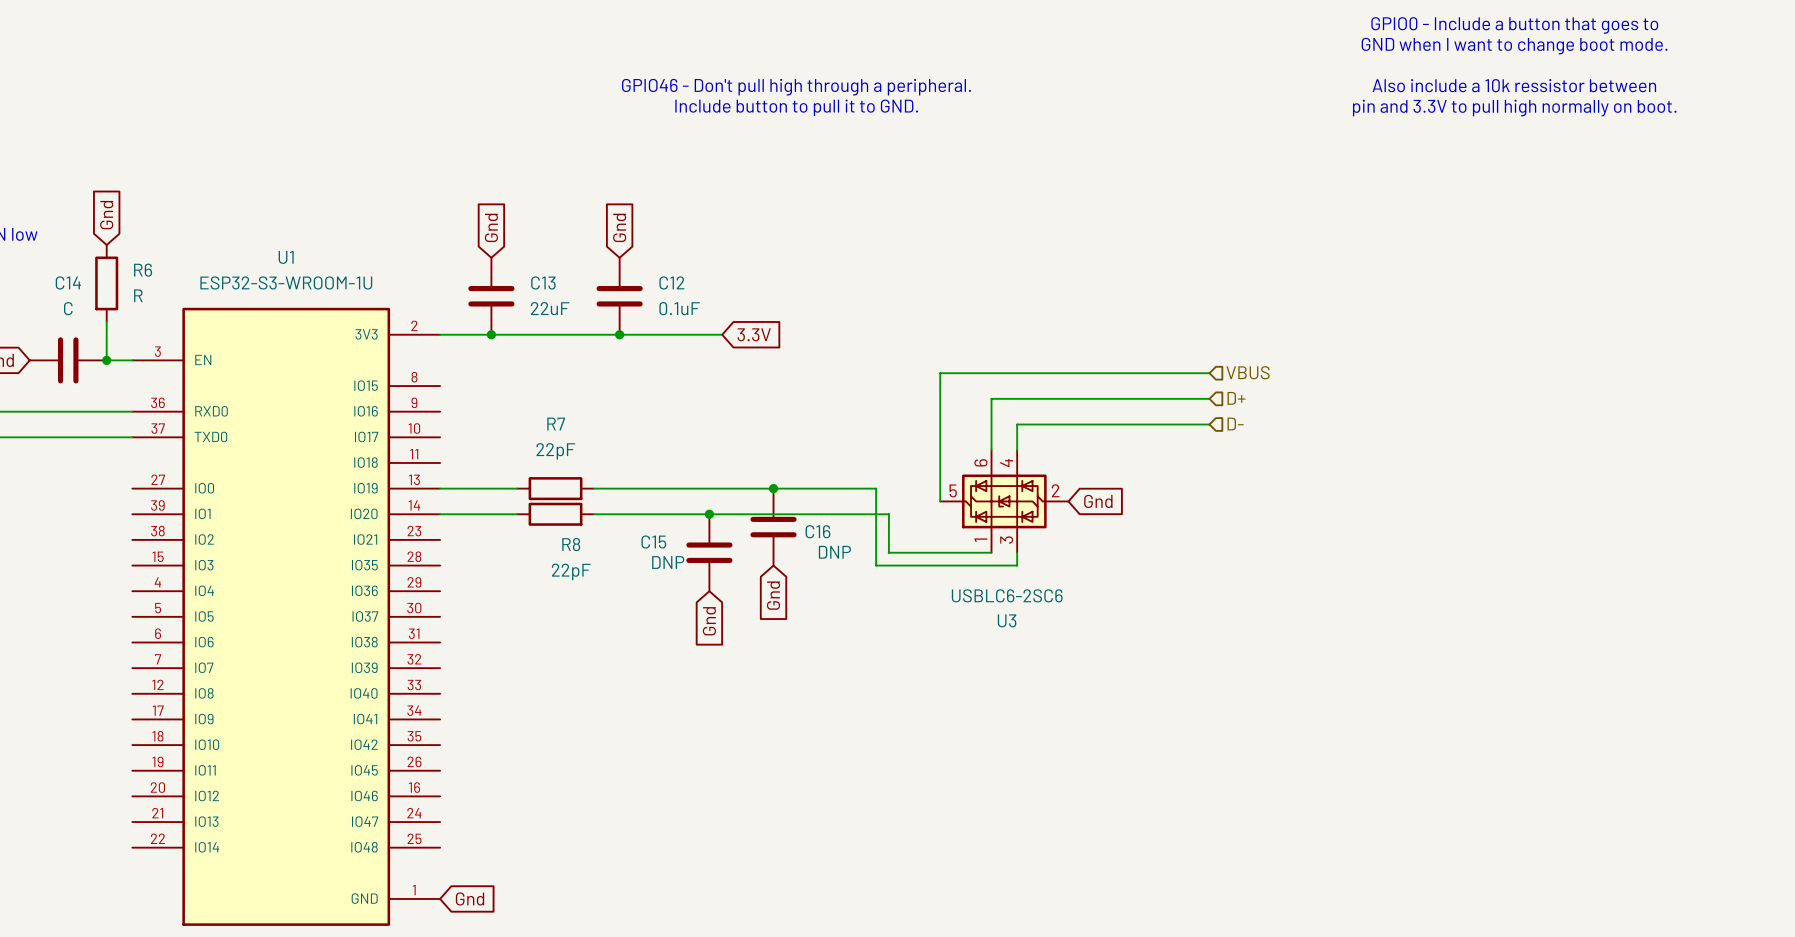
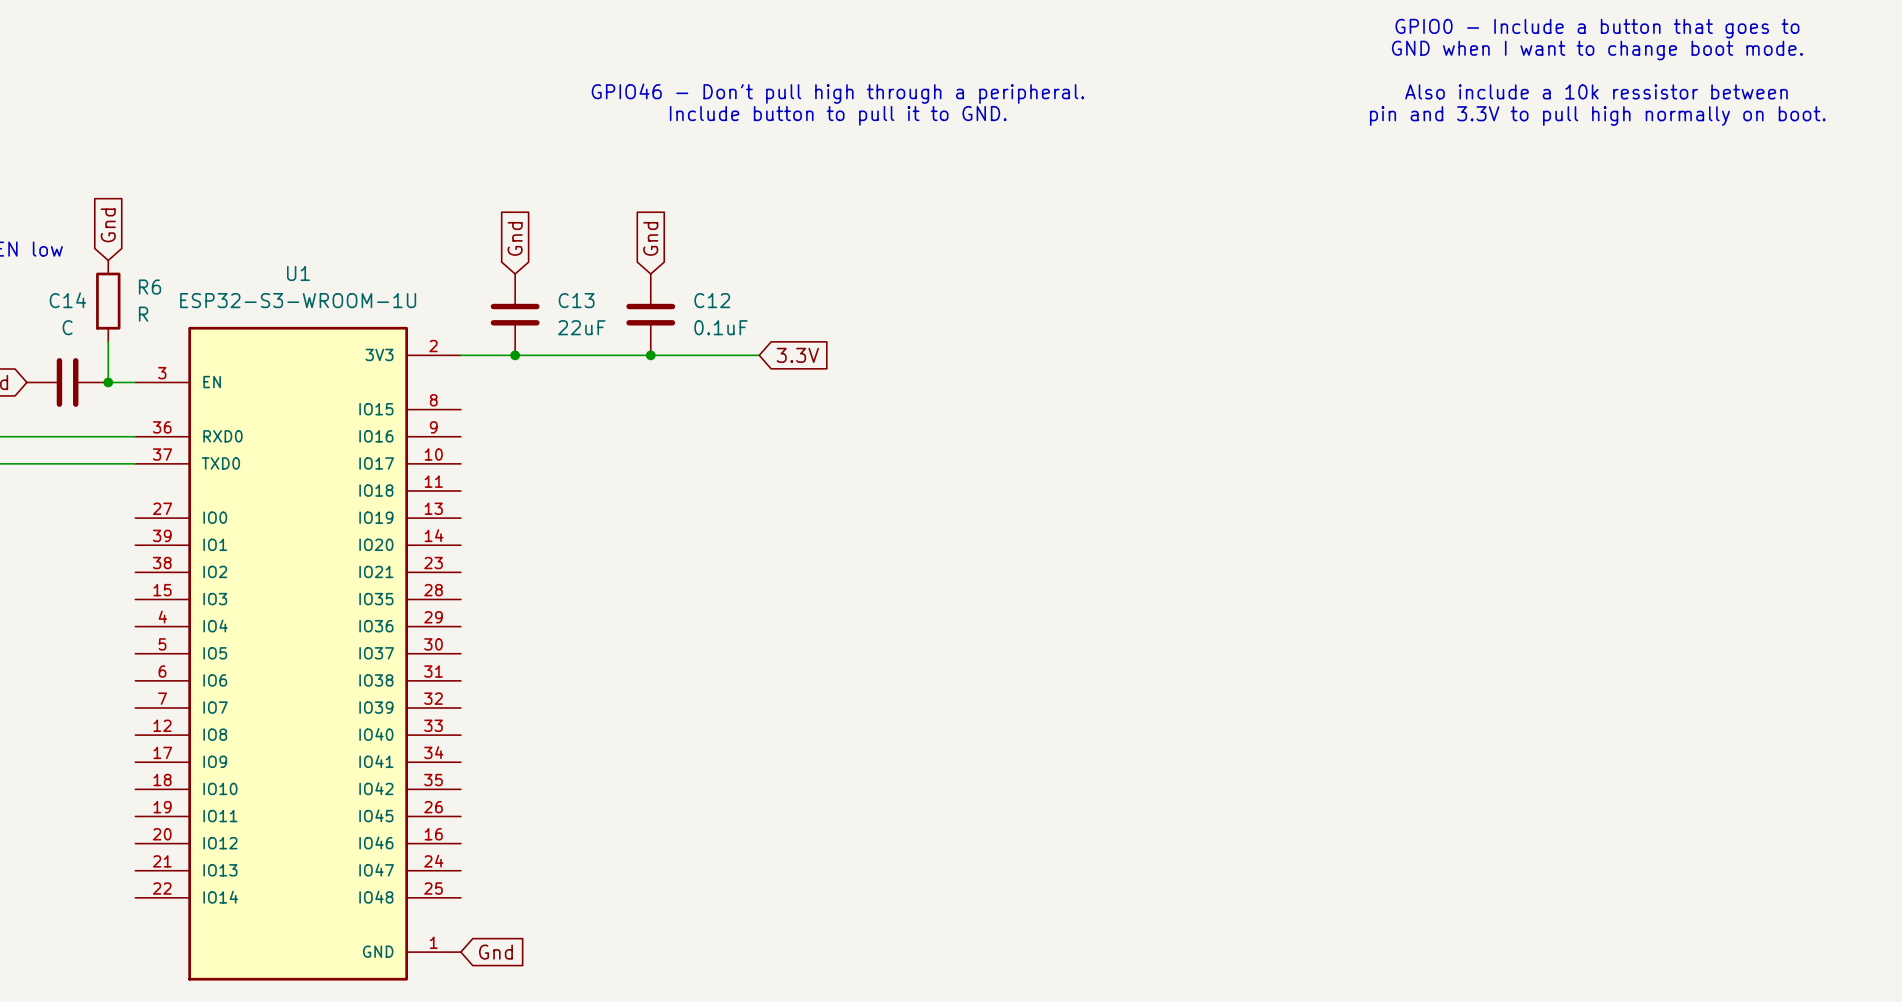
hierarchical label: VBUS (1248, 372) -> none
wire: (1209, 373) (940, 373) (940, 501) -> none
wire: (1209, 398) (991, 398) (991, 450) -> none
hierarchical label: D+ (1236, 398) -> none
wire: (1209, 424) (1017, 424) (1017, 450) -> none
hierarchical label: D- (1235, 424) -> none
wire: (440, 488) (517, 488) -> none
R7: 22pF (555, 488) -> none
wire: (593, 488) (876, 488) (876, 565) (1017, 565) (1017, 552) -> none
junction: (773, 488) -> none
U3: USBLC6-2SC6 (1004, 501) -> none
global label: Gnd (1098, 501) -> none
wire: (440, 514) (517, 514) -> none
R8: 22pF (555, 514) -> none
wire: (593, 514) (888, 514) (888, 552) (991, 552) -> none
junction: (709, 514) -> none
C16: DNP (773, 527) -> none
C15: DNP (709, 552) -> none
global label: Gnd (773, 595) -> none
global label: Gnd (709, 621) -> none

